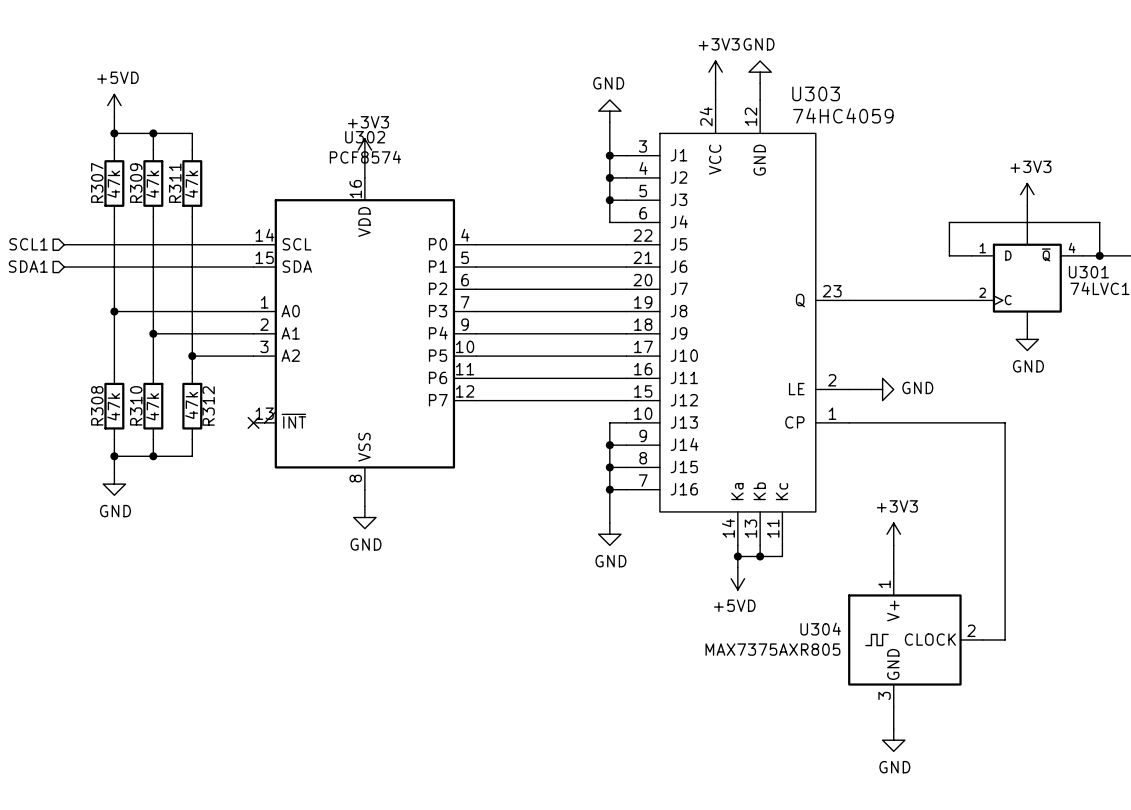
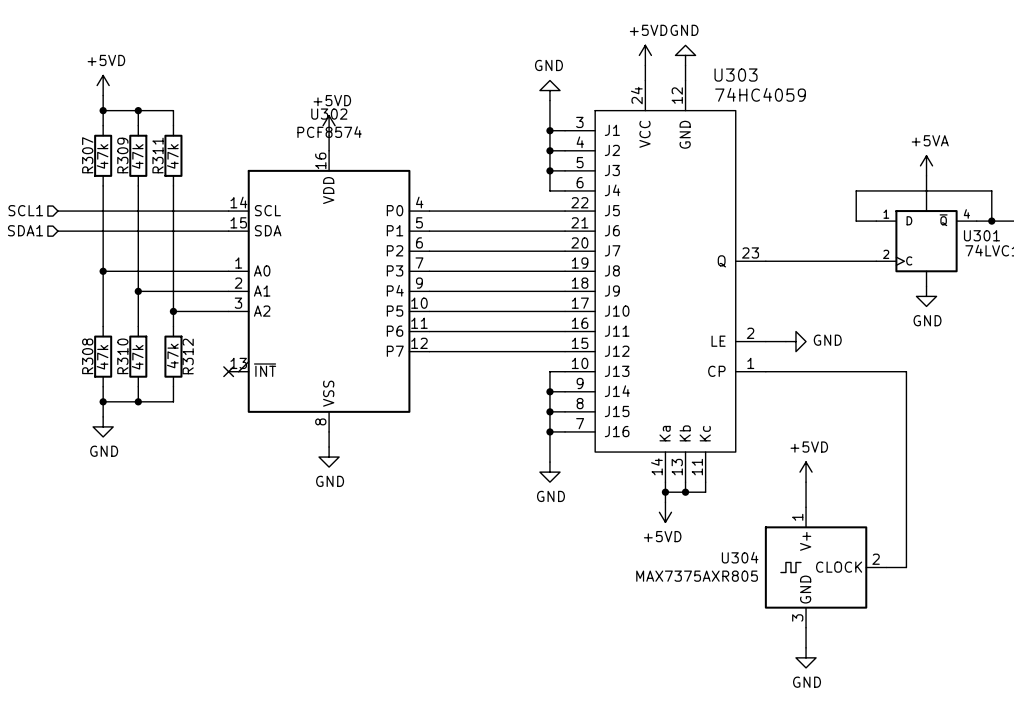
power symbol: +3V3 (715, 72) -> +5VD (645, 55)
power symbol: +3V3 (364, 150) -> +5VD (329, 125)
power symbol: +3V3 (1027, 194) -> +5VA (926, 165)
power symbol: +3V3 (893, 534) -> +5VD (806, 472)

